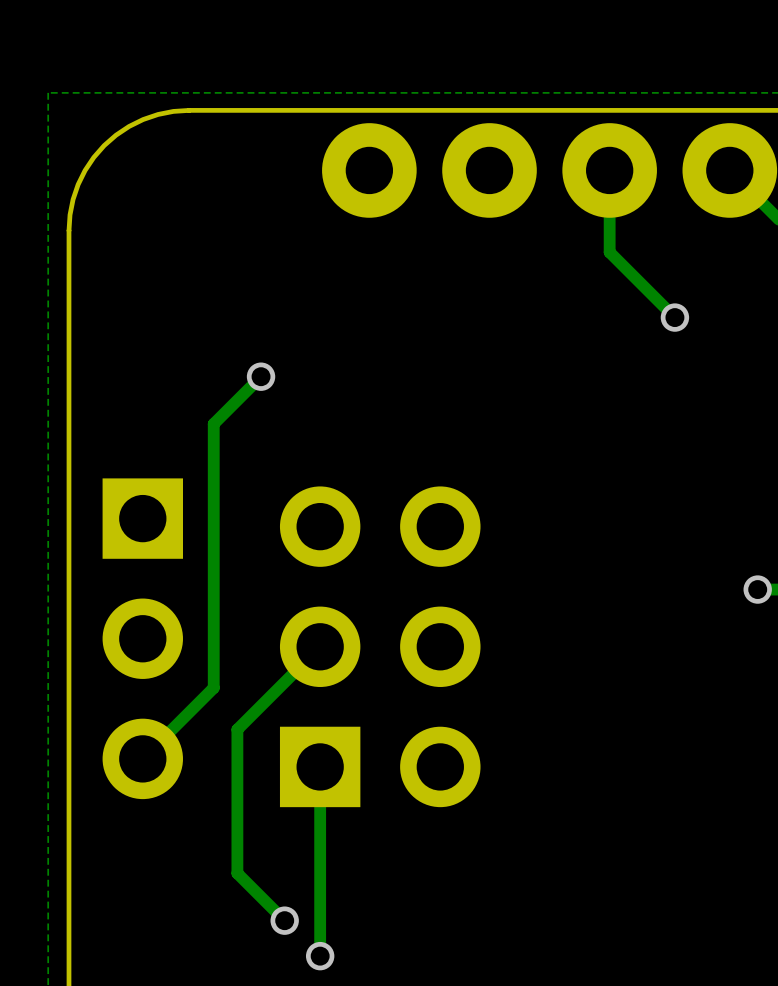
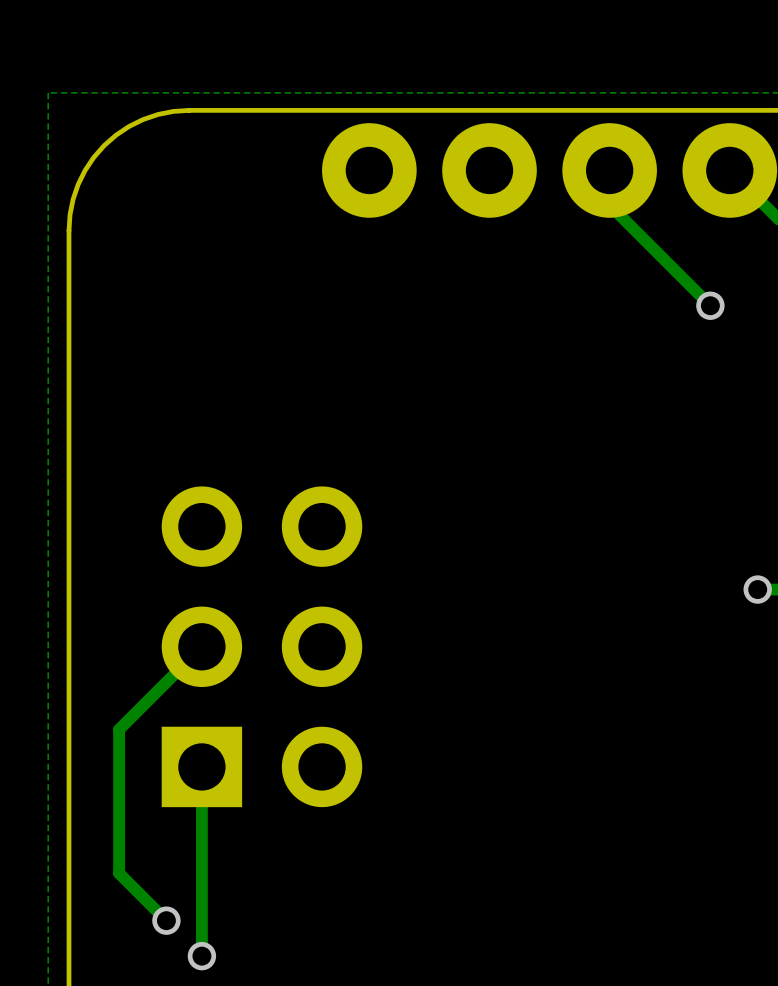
track: (609, 204) (609, 252) (674, 317) -> (609, 204) (710, 305)
via position: (674, 317) -> (710, 305)
track: (261, 376) (213, 424) (213, 687) (142, 758) (142, 755) -> none
via: (261, 376) -> none
part: (142, 638) -> none
track: (310, 646) (320, 646) (237, 729) (237, 873) (284, 920) -> (191, 646) (201, 646) (119, 729) (119, 873) (166, 920)
part position: (380, 646) -> (261, 646)
track: (320, 766) (320, 956) -> (201, 766) (201, 956)
via: none -> (166, 920)
via: (284, 920) -> none
via: none -> (201, 956)
via: (320, 956) -> none

